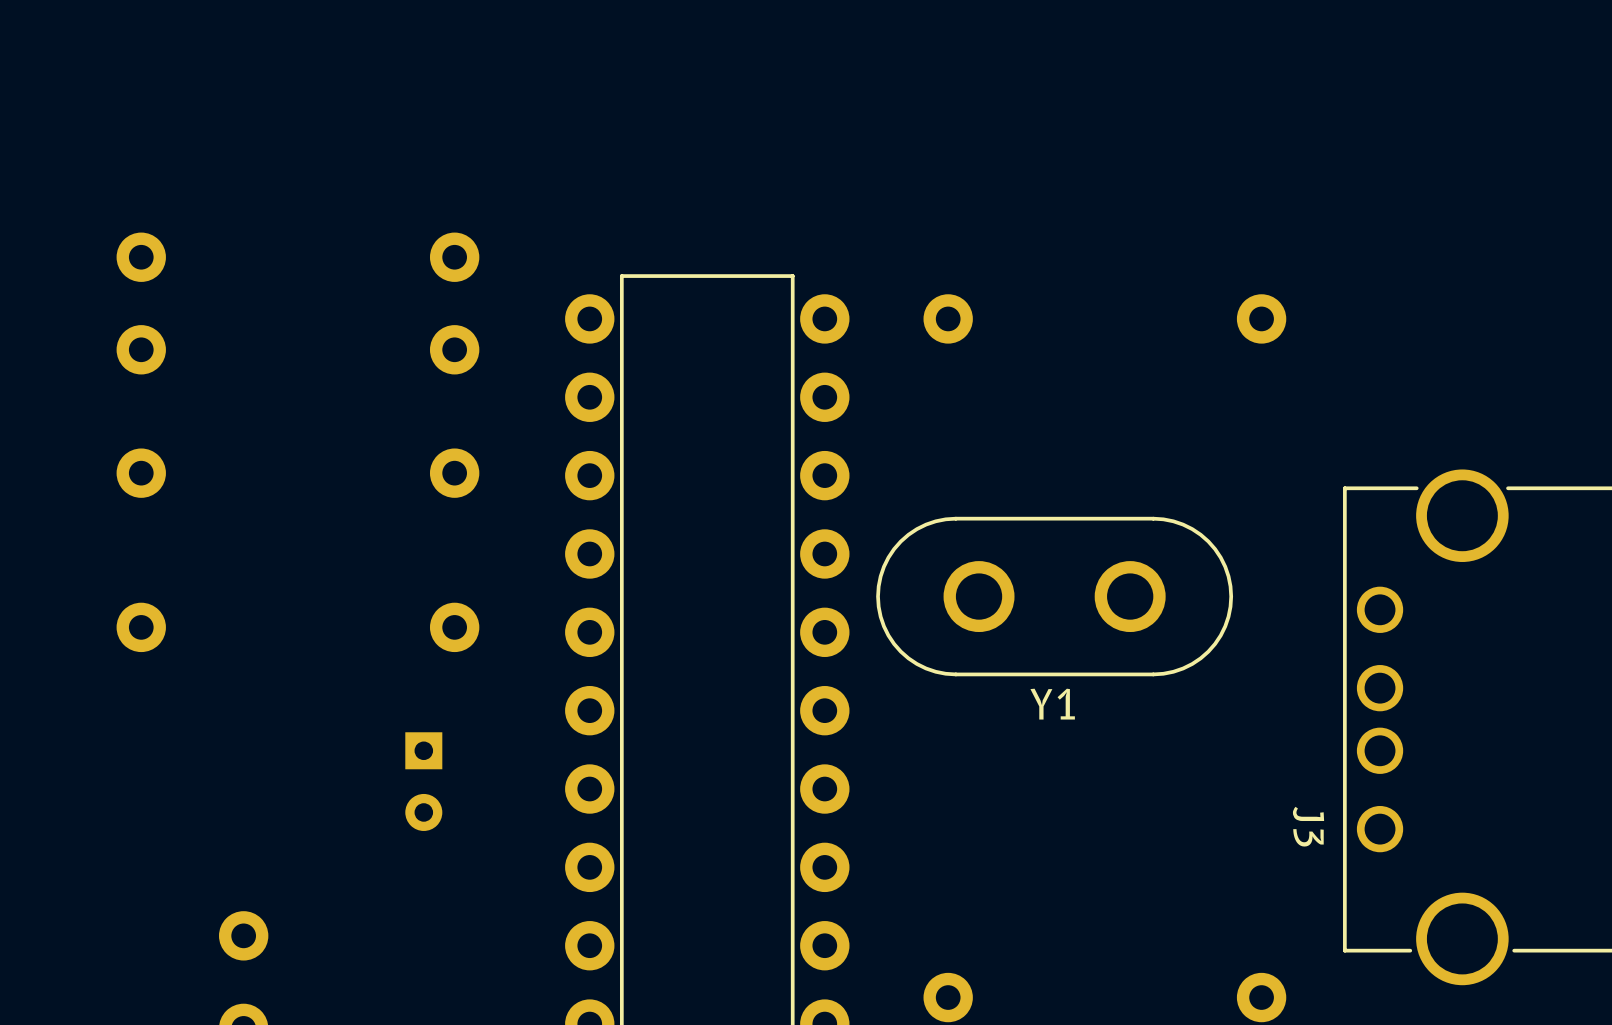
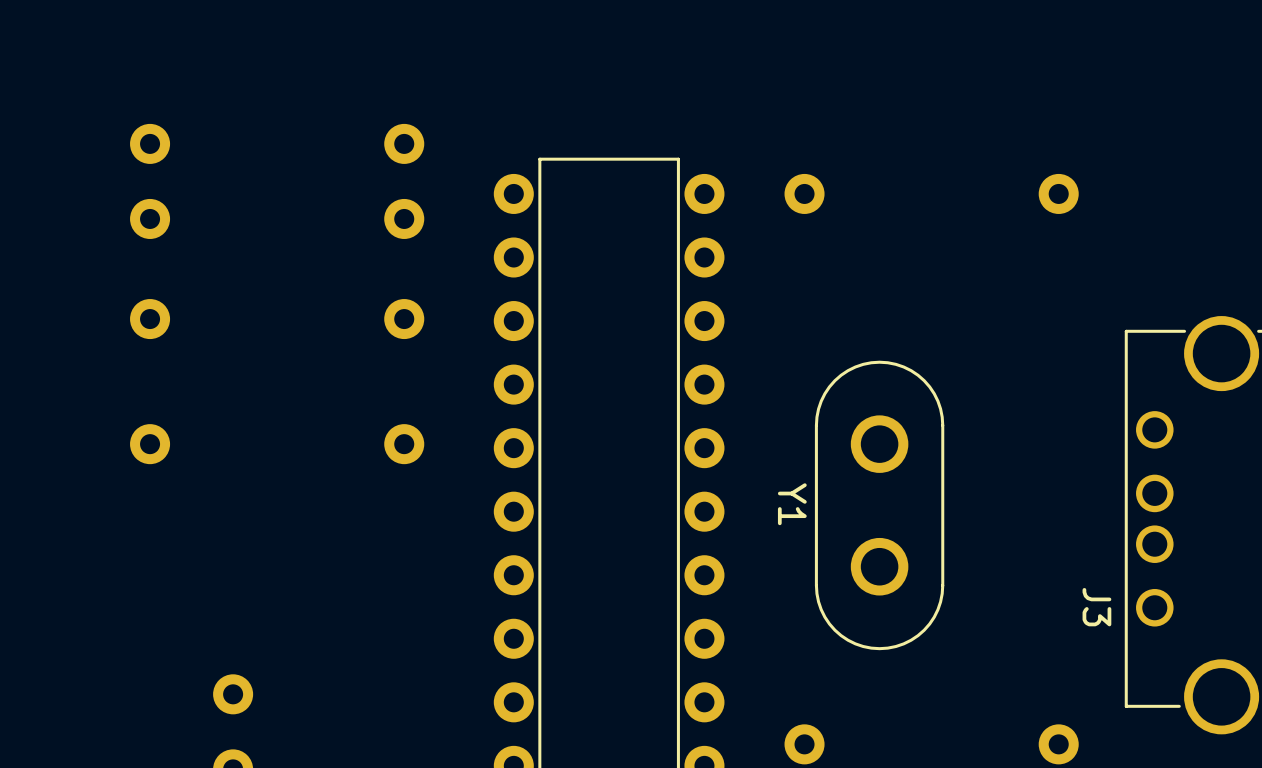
Y1 rotation: 0° (1054, 596) -> 90° clockwise (879, 505)
part: (423, 781) -> none

